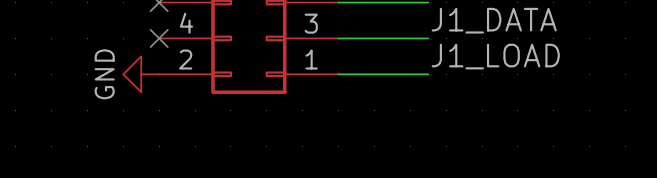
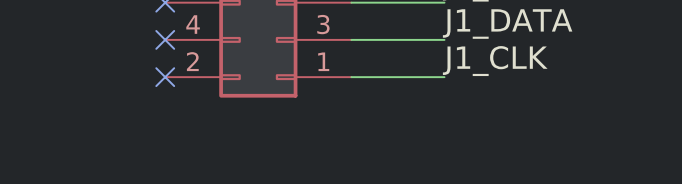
label: J1_LOAD (495, 56) -> J1_CLK (495, 61)
power symbol: GND (141, 74) -> none
no-connect mark: none -> (165, 77)

